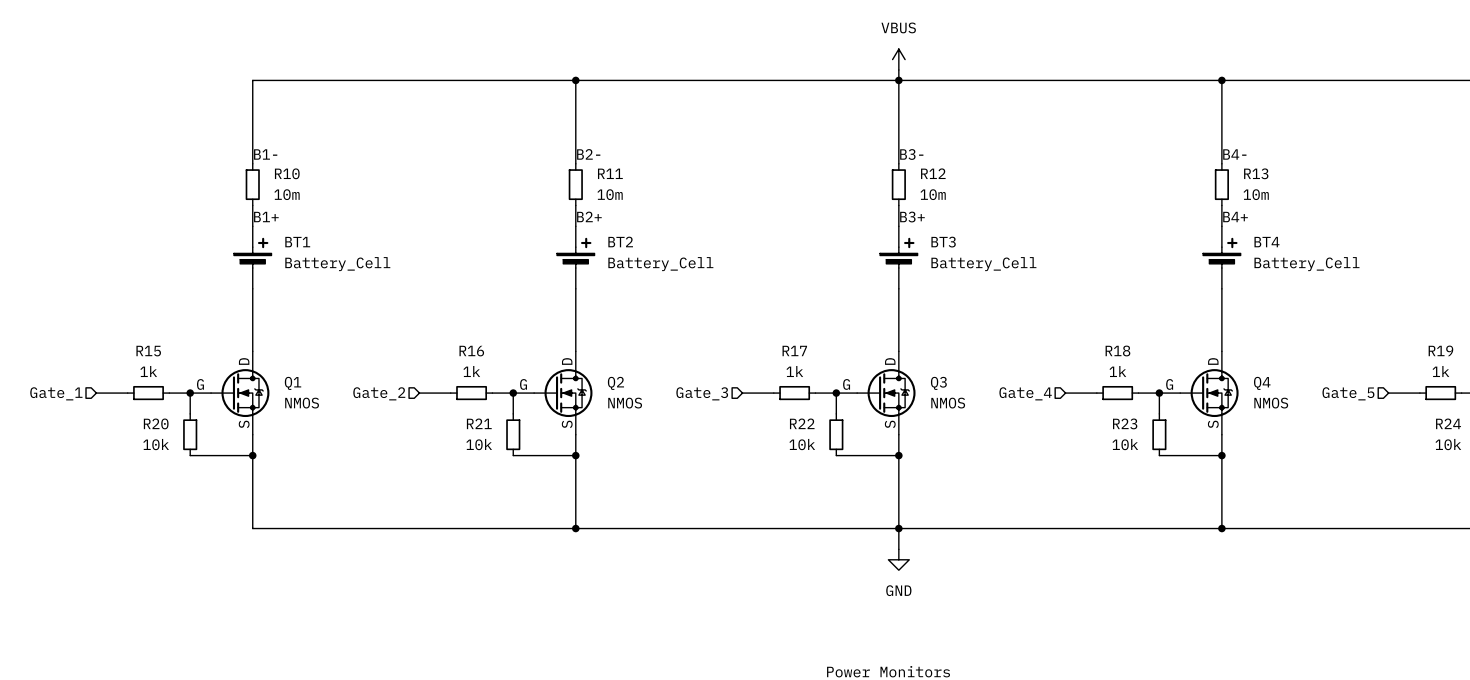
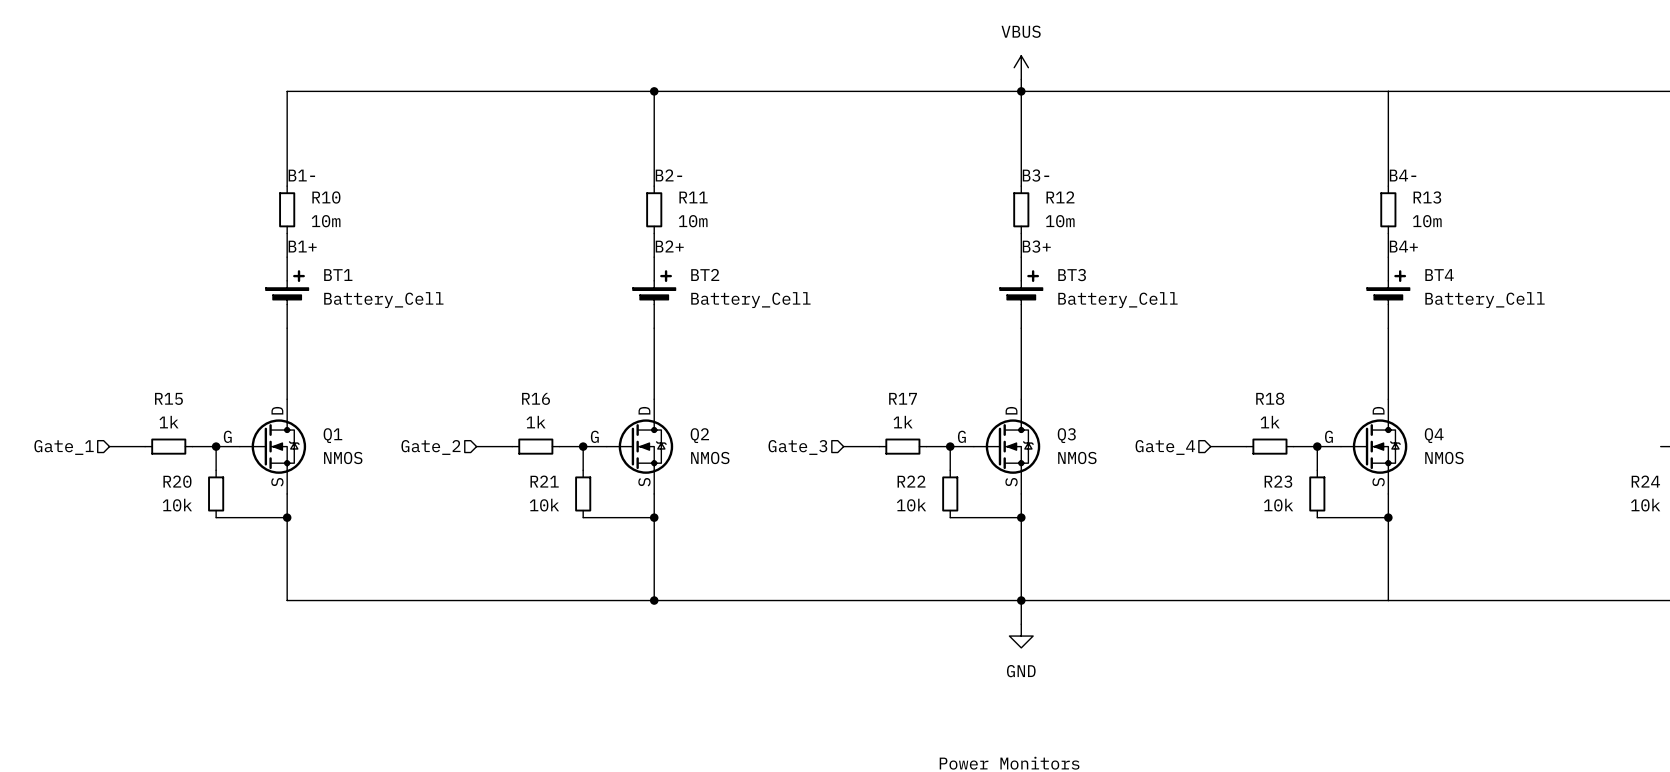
junction: (1221, 80) -> none
hierarchical label: Gate_5 (1348, 393) -> none
wire: (1388, 393) (1419, 393) -> none
R19: 1k (1440, 393) -> none
junction: (1221, 528) -> none

